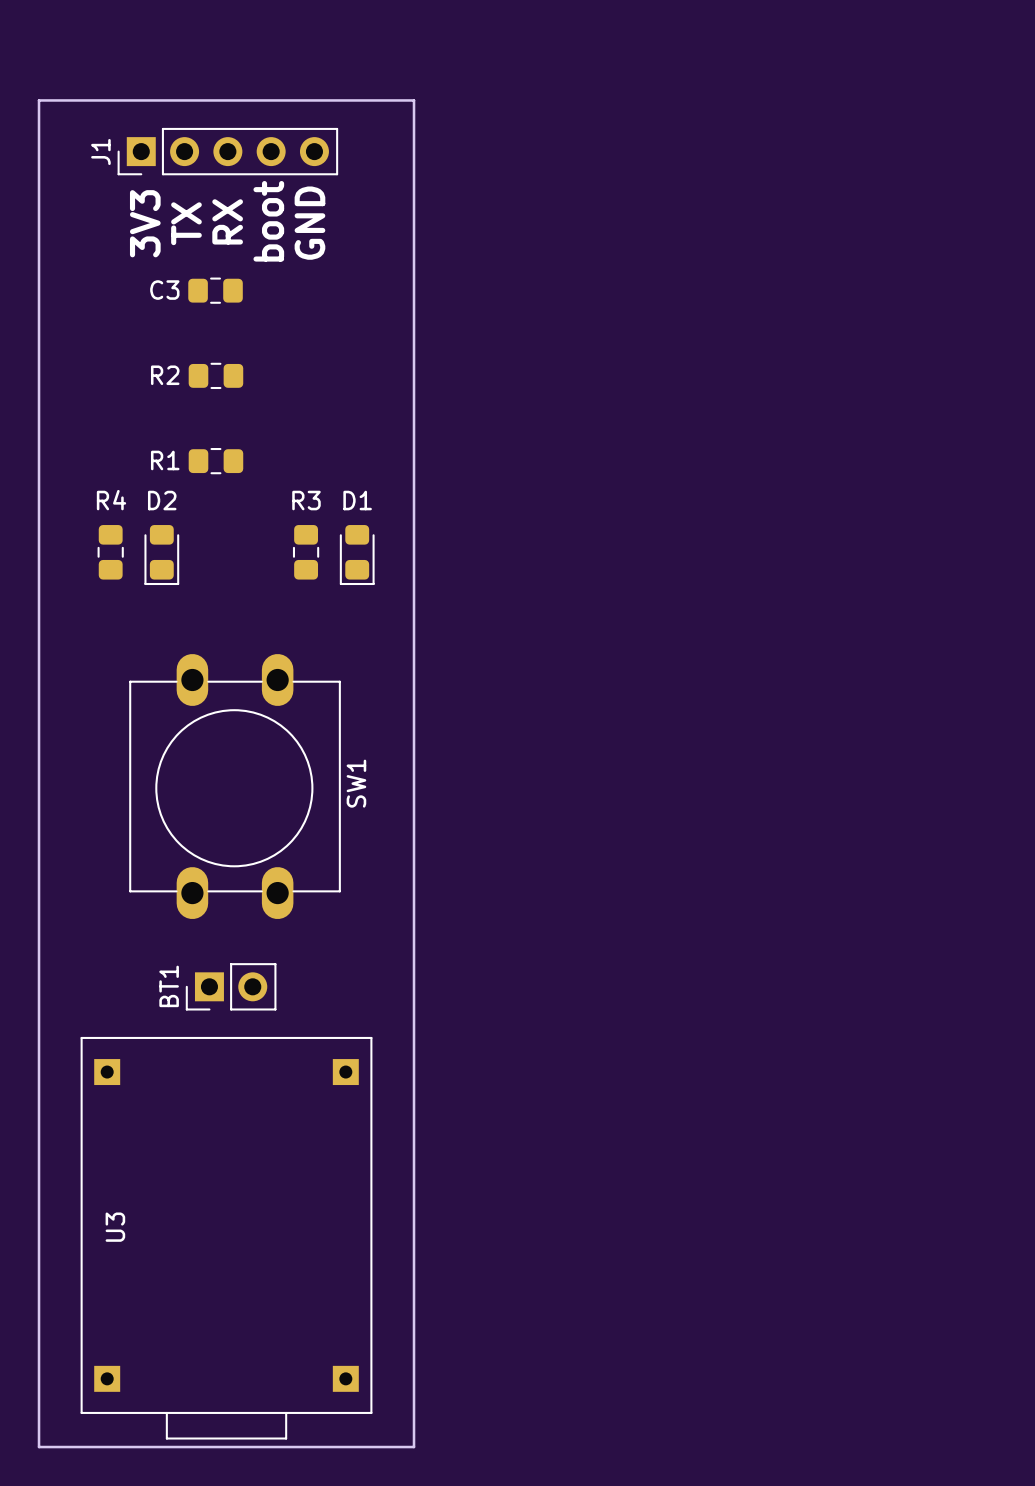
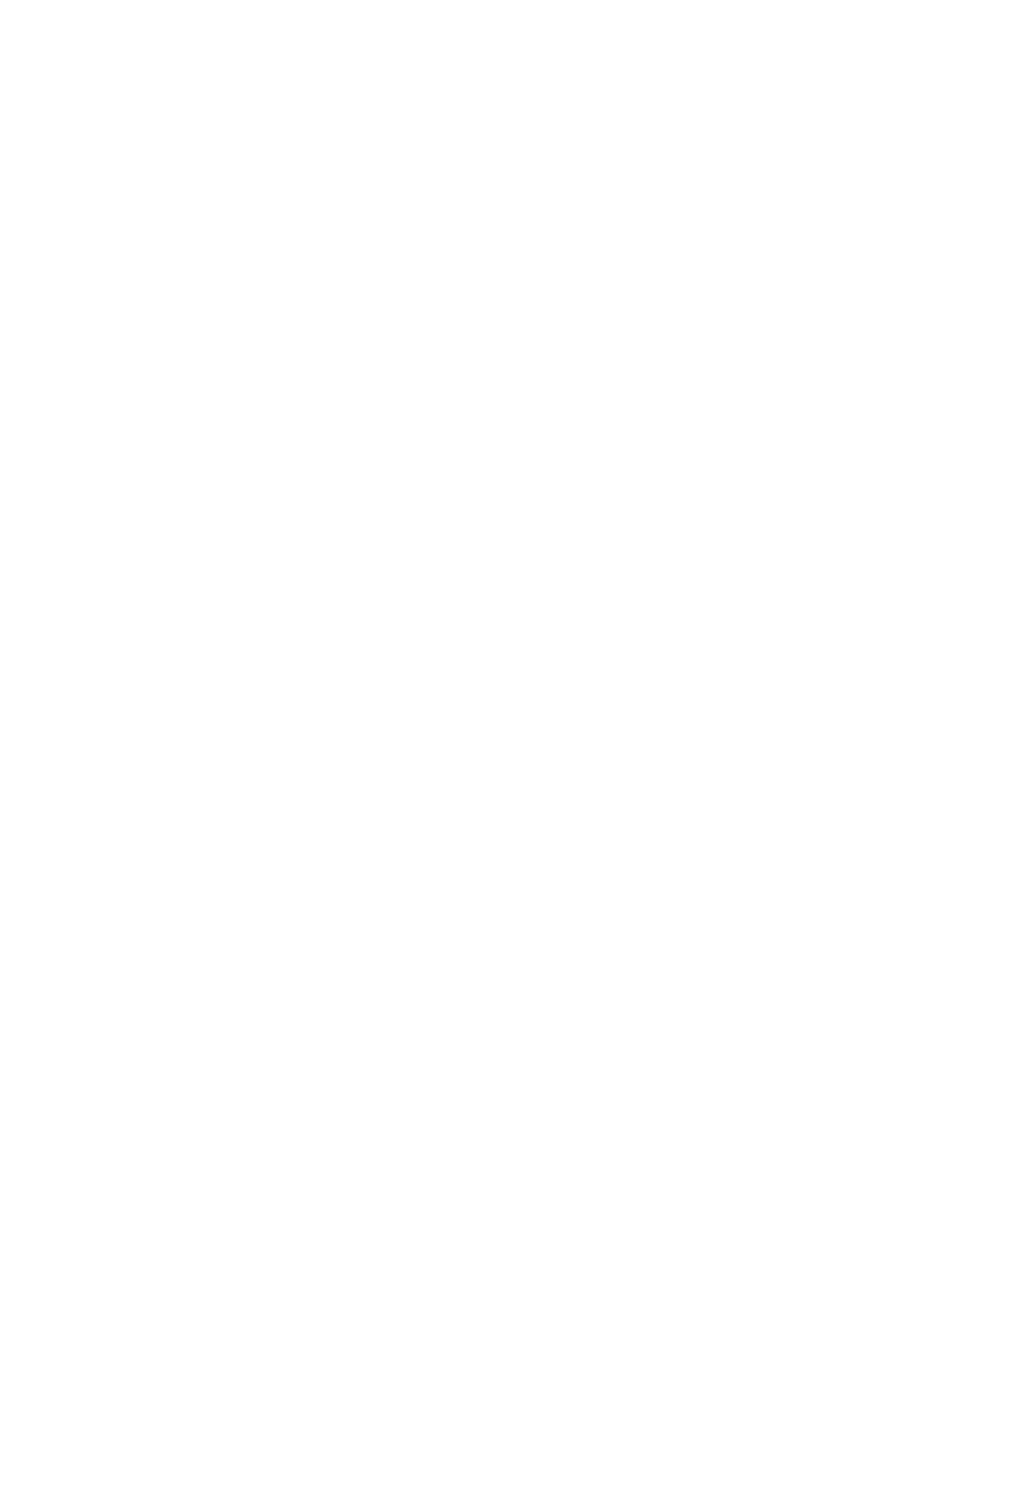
board edge: (39, 100) (39, 1447) (414, 1447) (414, 100) (39, 100) -> none
J1: (227, 151) -> none
text: RX (227, 221) -> none
text: boot (268, 221) -> none
text: 3V3 (145, 223) -> none
text: TX (186, 223) -> none
text: GND (309, 223) -> none
C3: (215, 290) -> none
R2: (215, 375) -> none
R1: (215, 461) -> none
R4: (110, 552) -> none
R3: (306, 552) -> none
D2: (161, 555) -> none
D1: (357, 555) -> none
SW1: (235, 786) -> none
BT1: (231, 986) -> none
U3: (226, 1238) -> none

